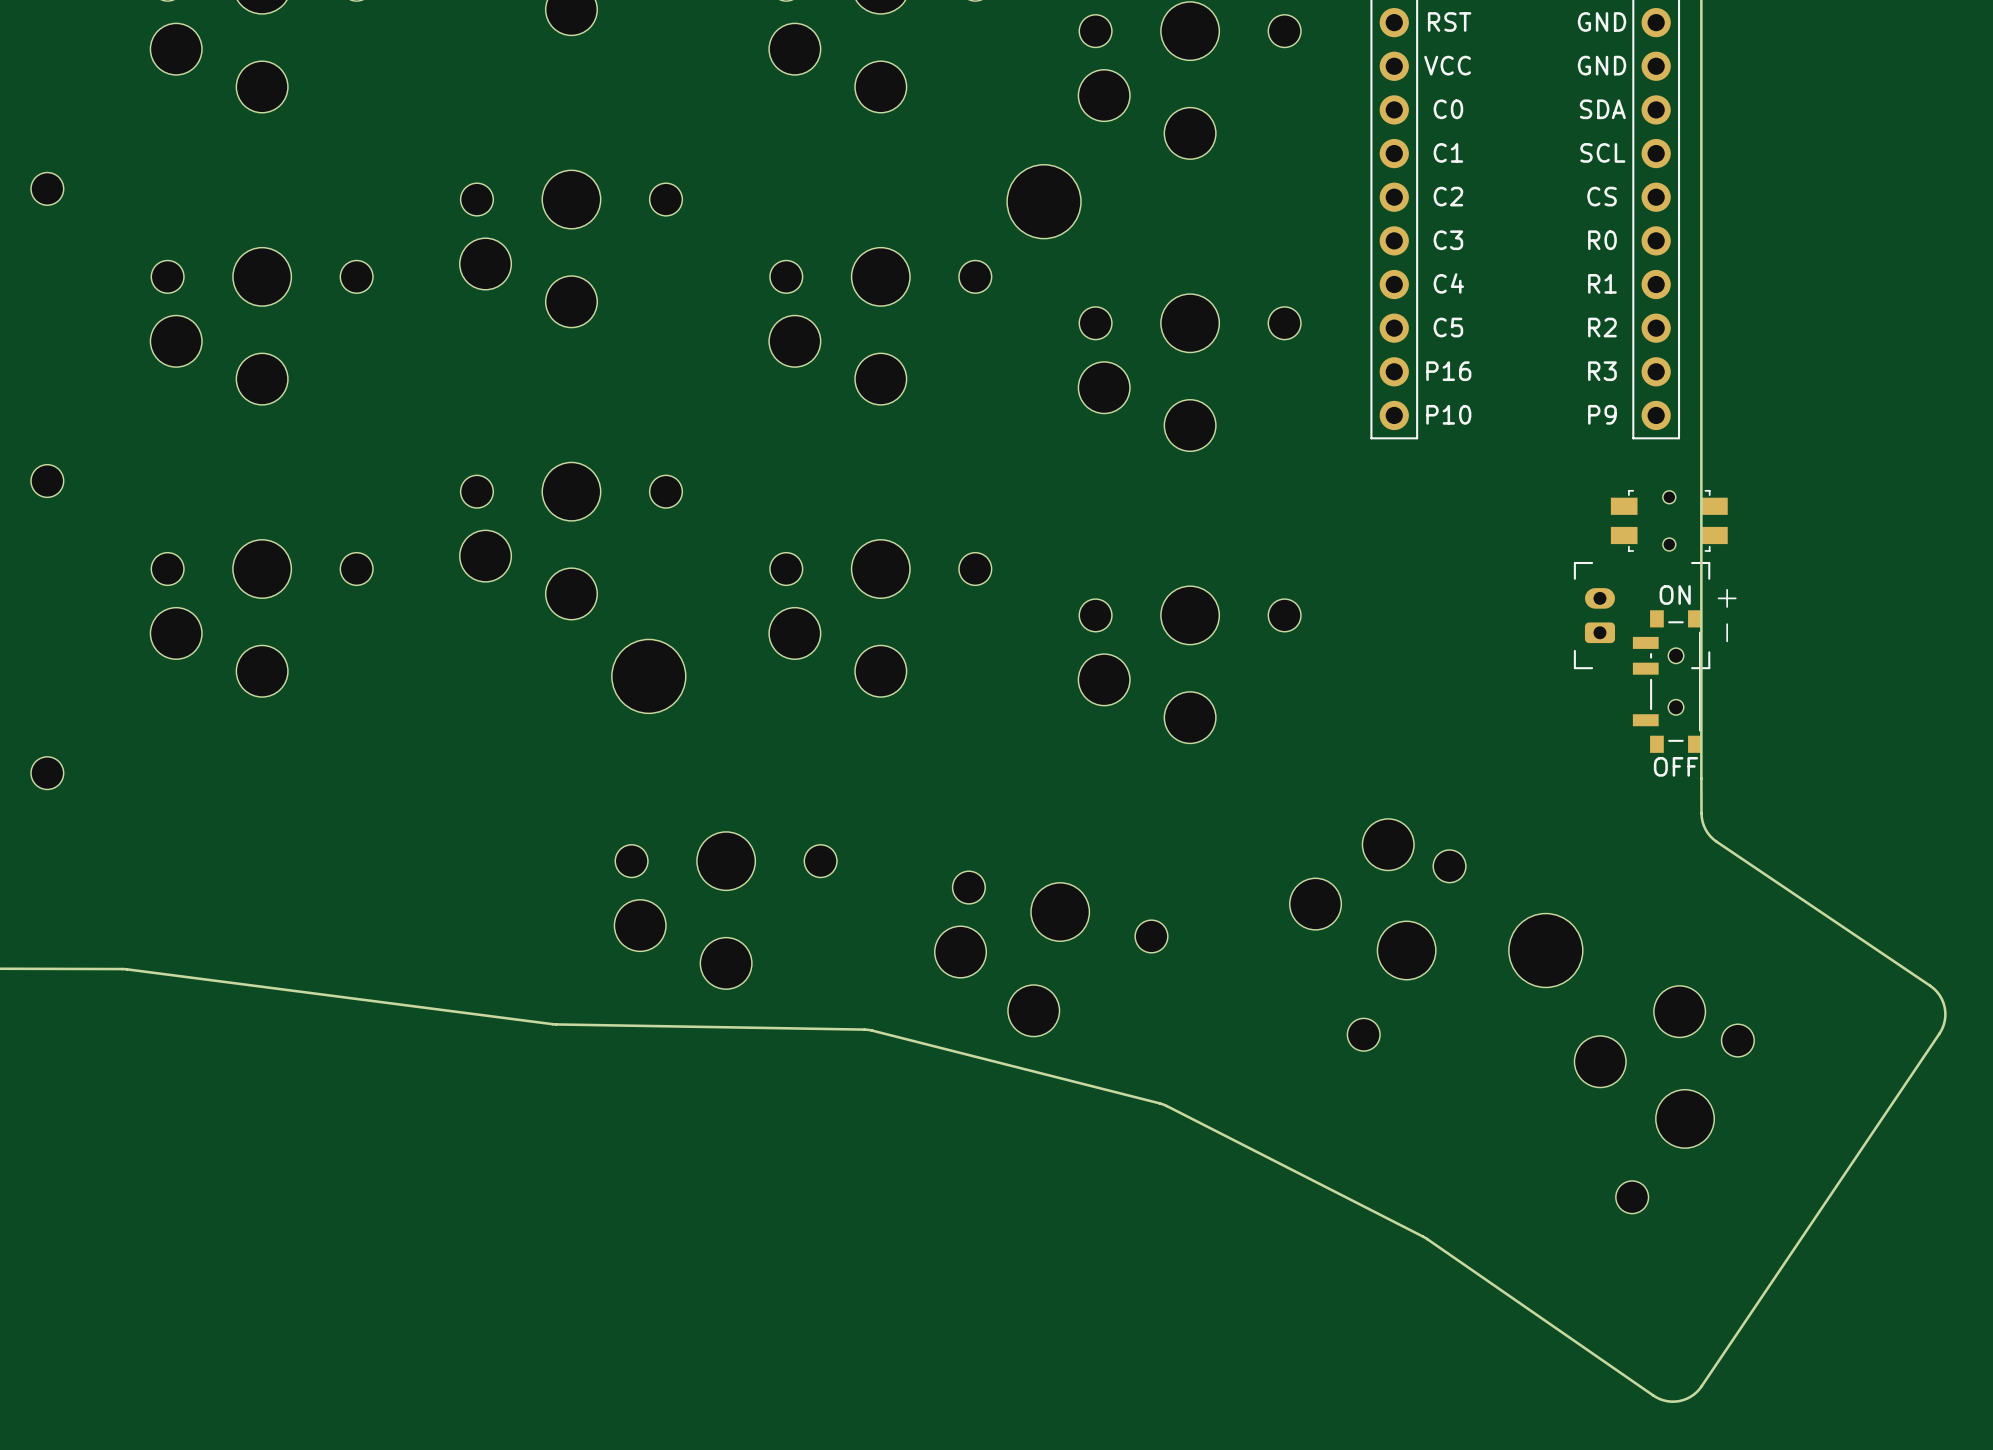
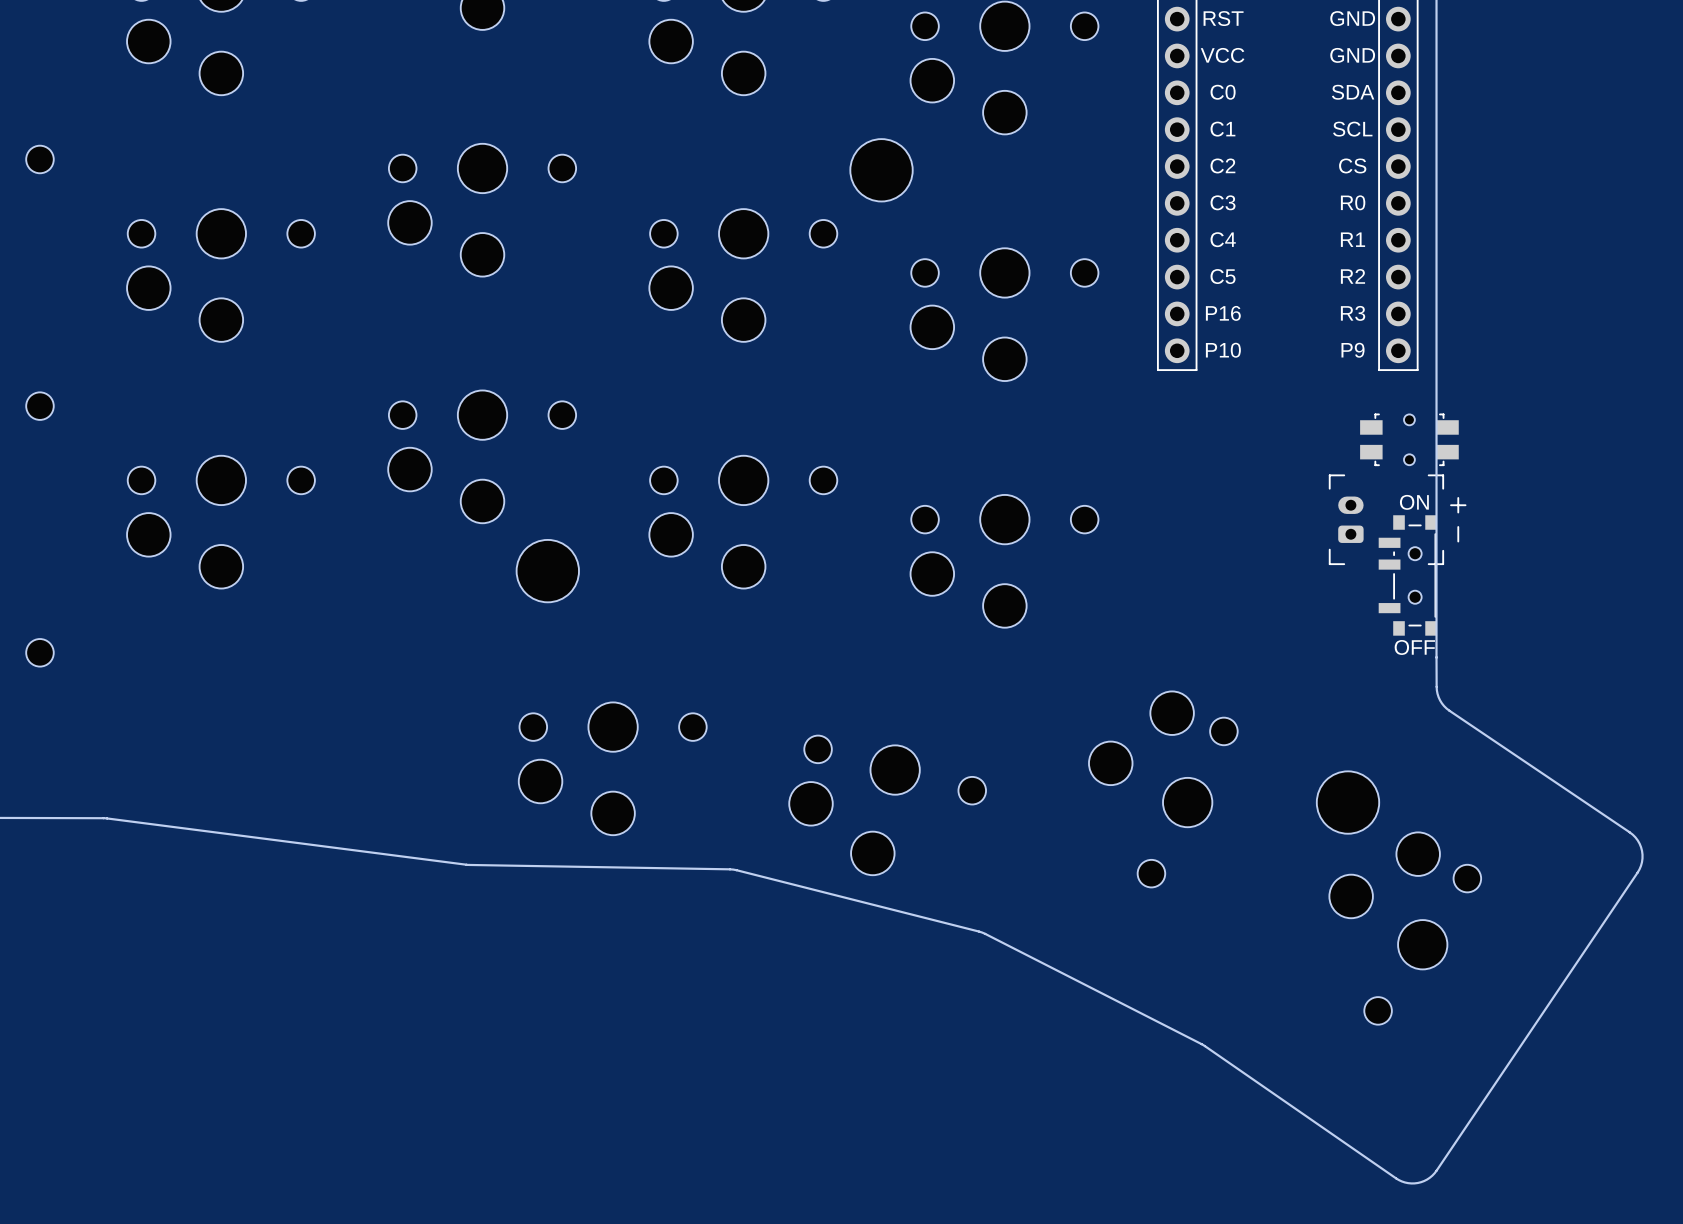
part position: (1545, 950) -> (1348, 802)

